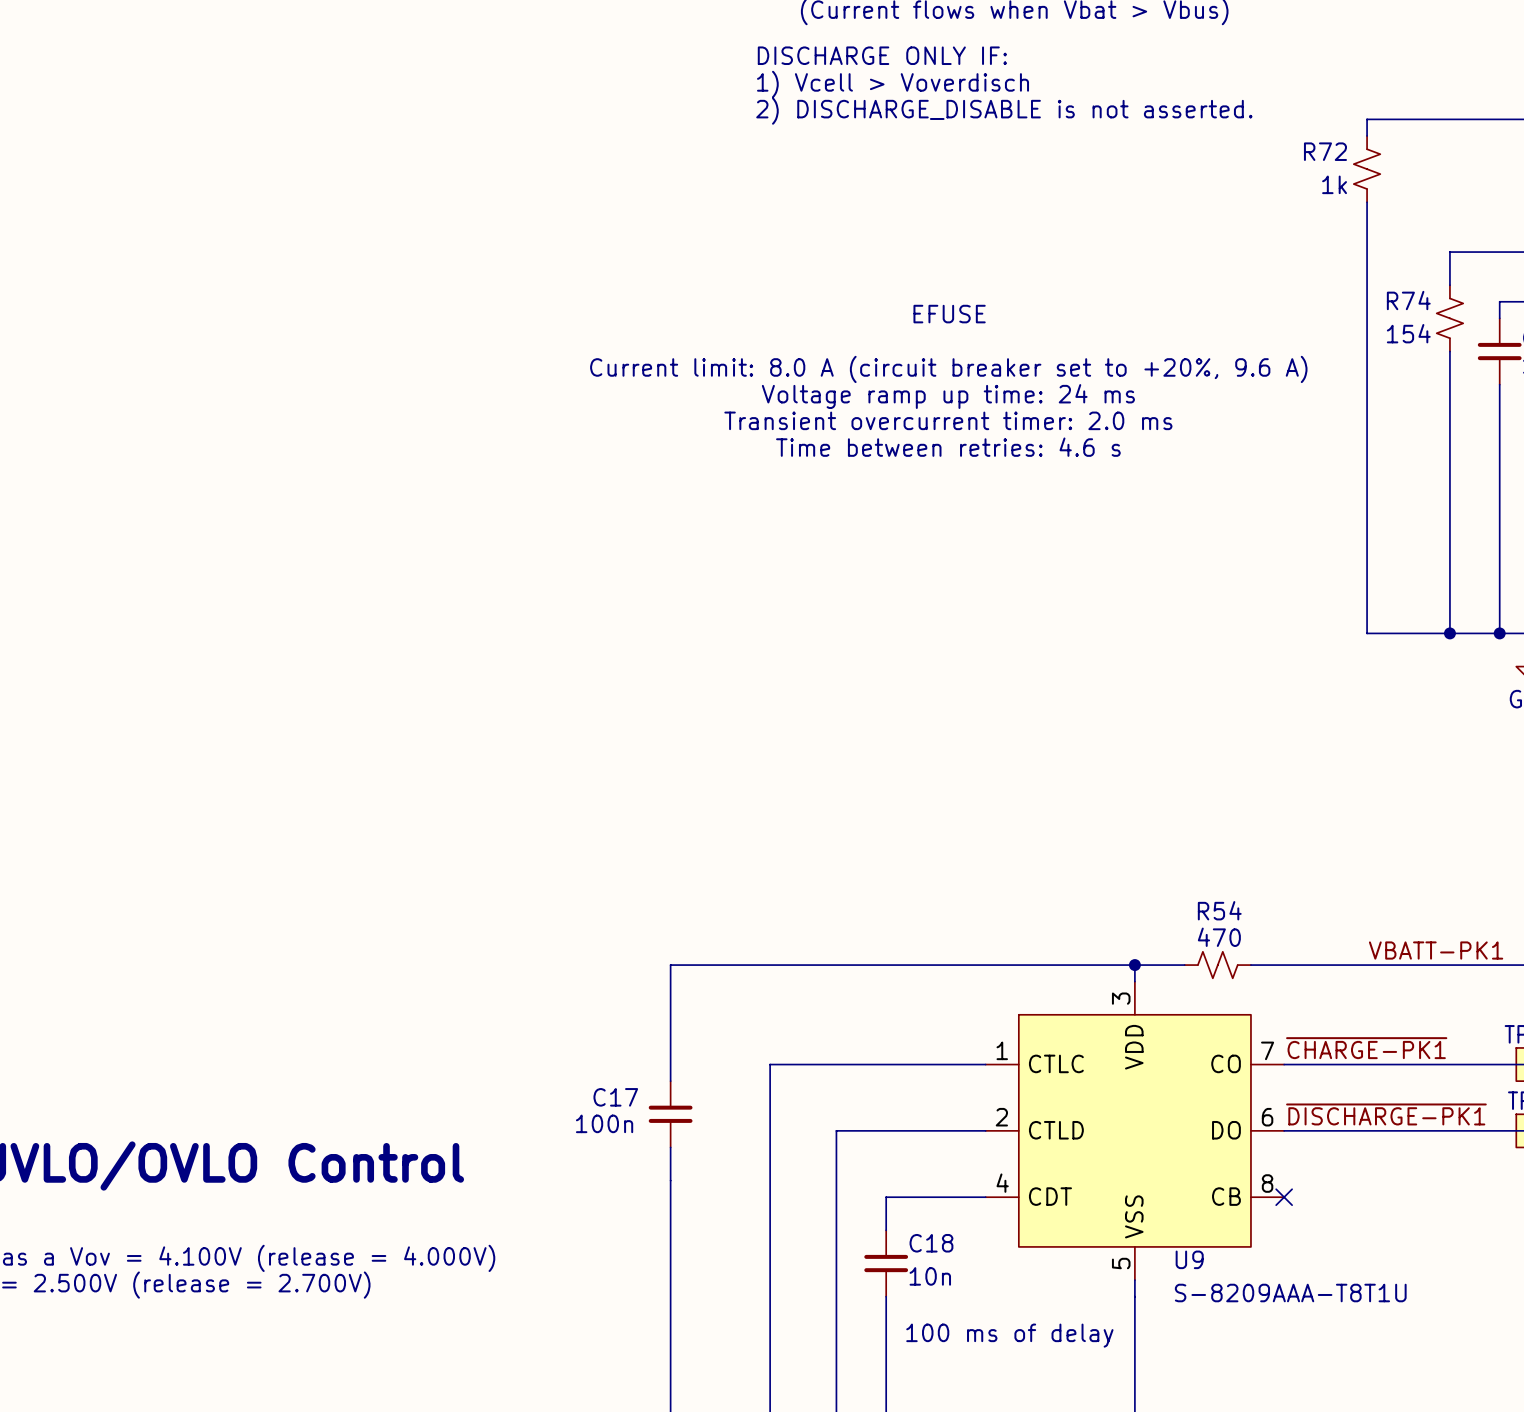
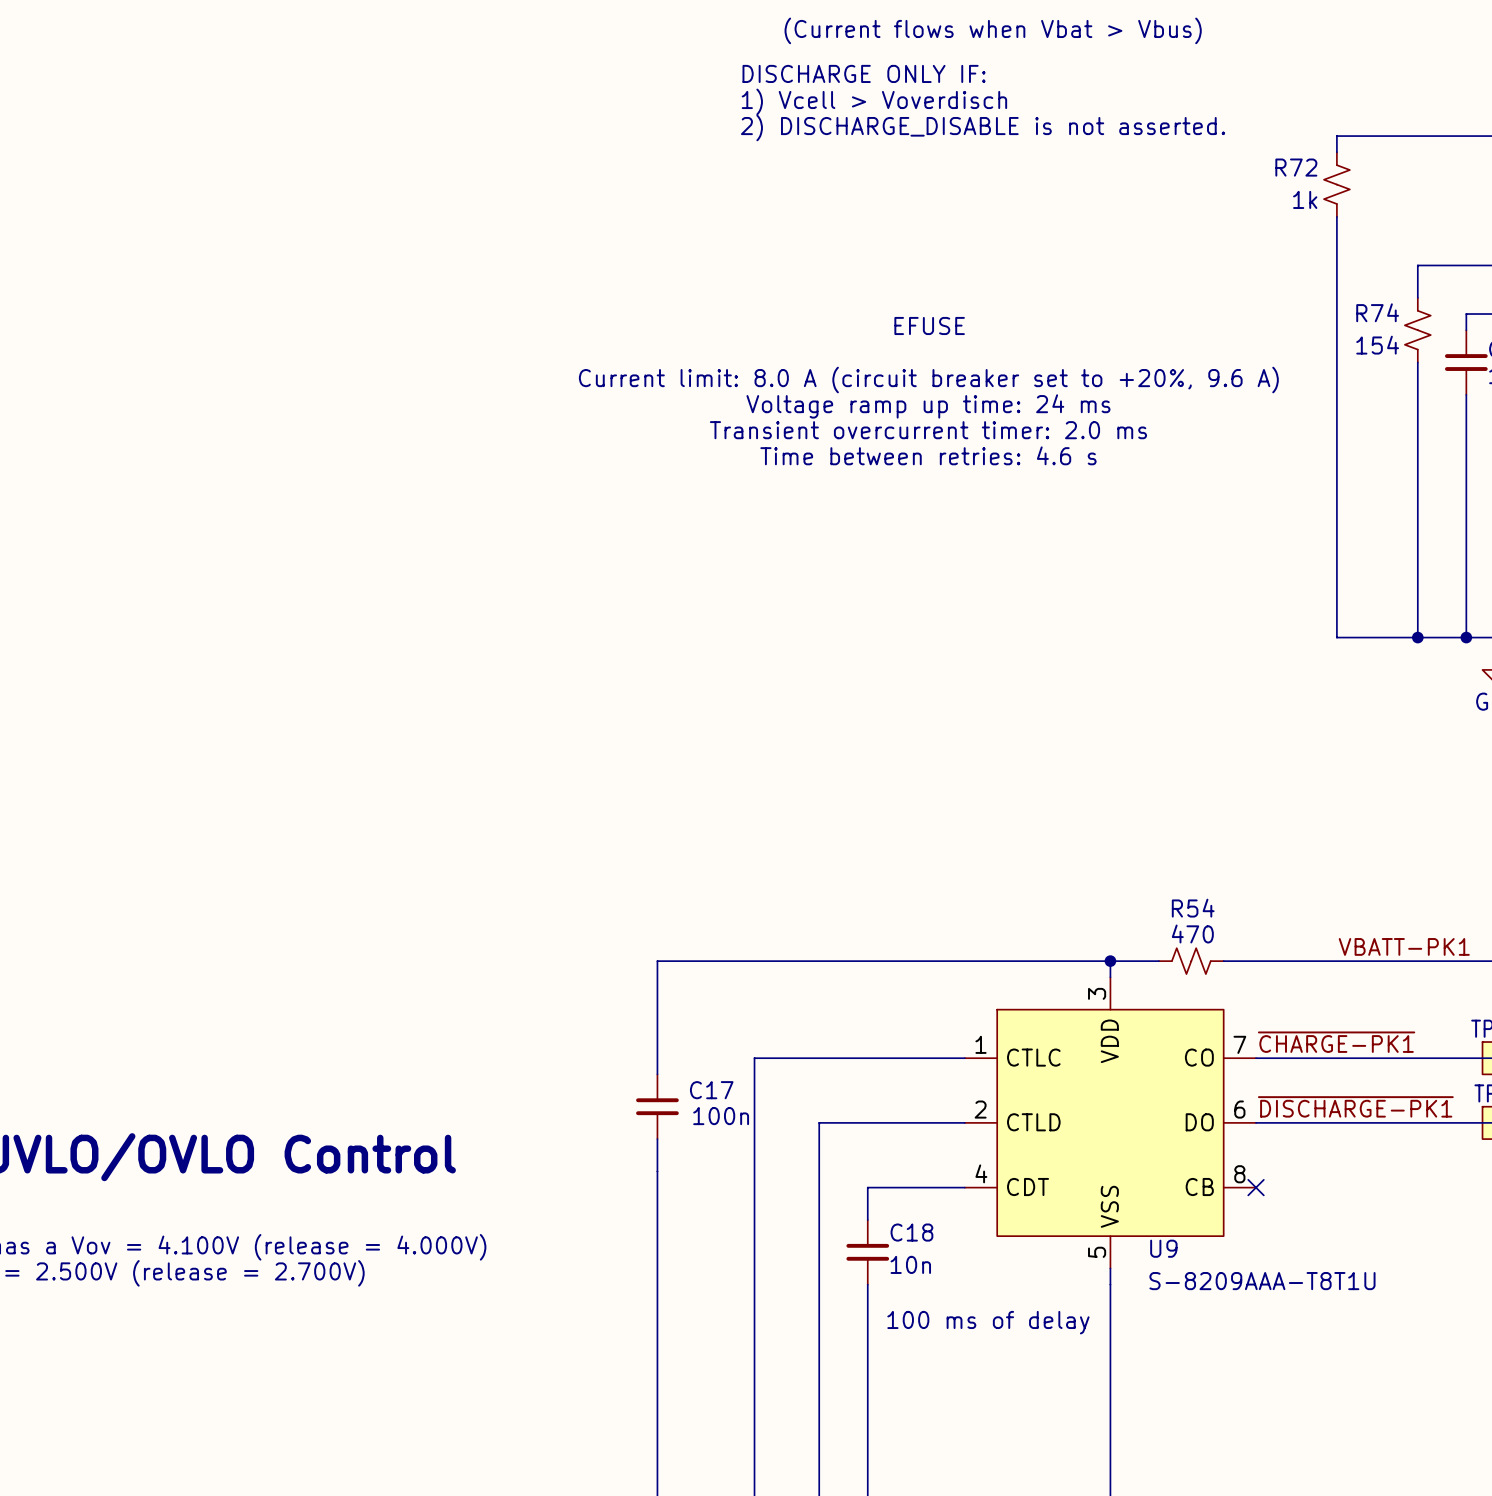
C17 name position: C17 (615, 1097) -> C17 (711, 1090)
C17 value position: 100n (604, 1123) -> 100n (721, 1116)

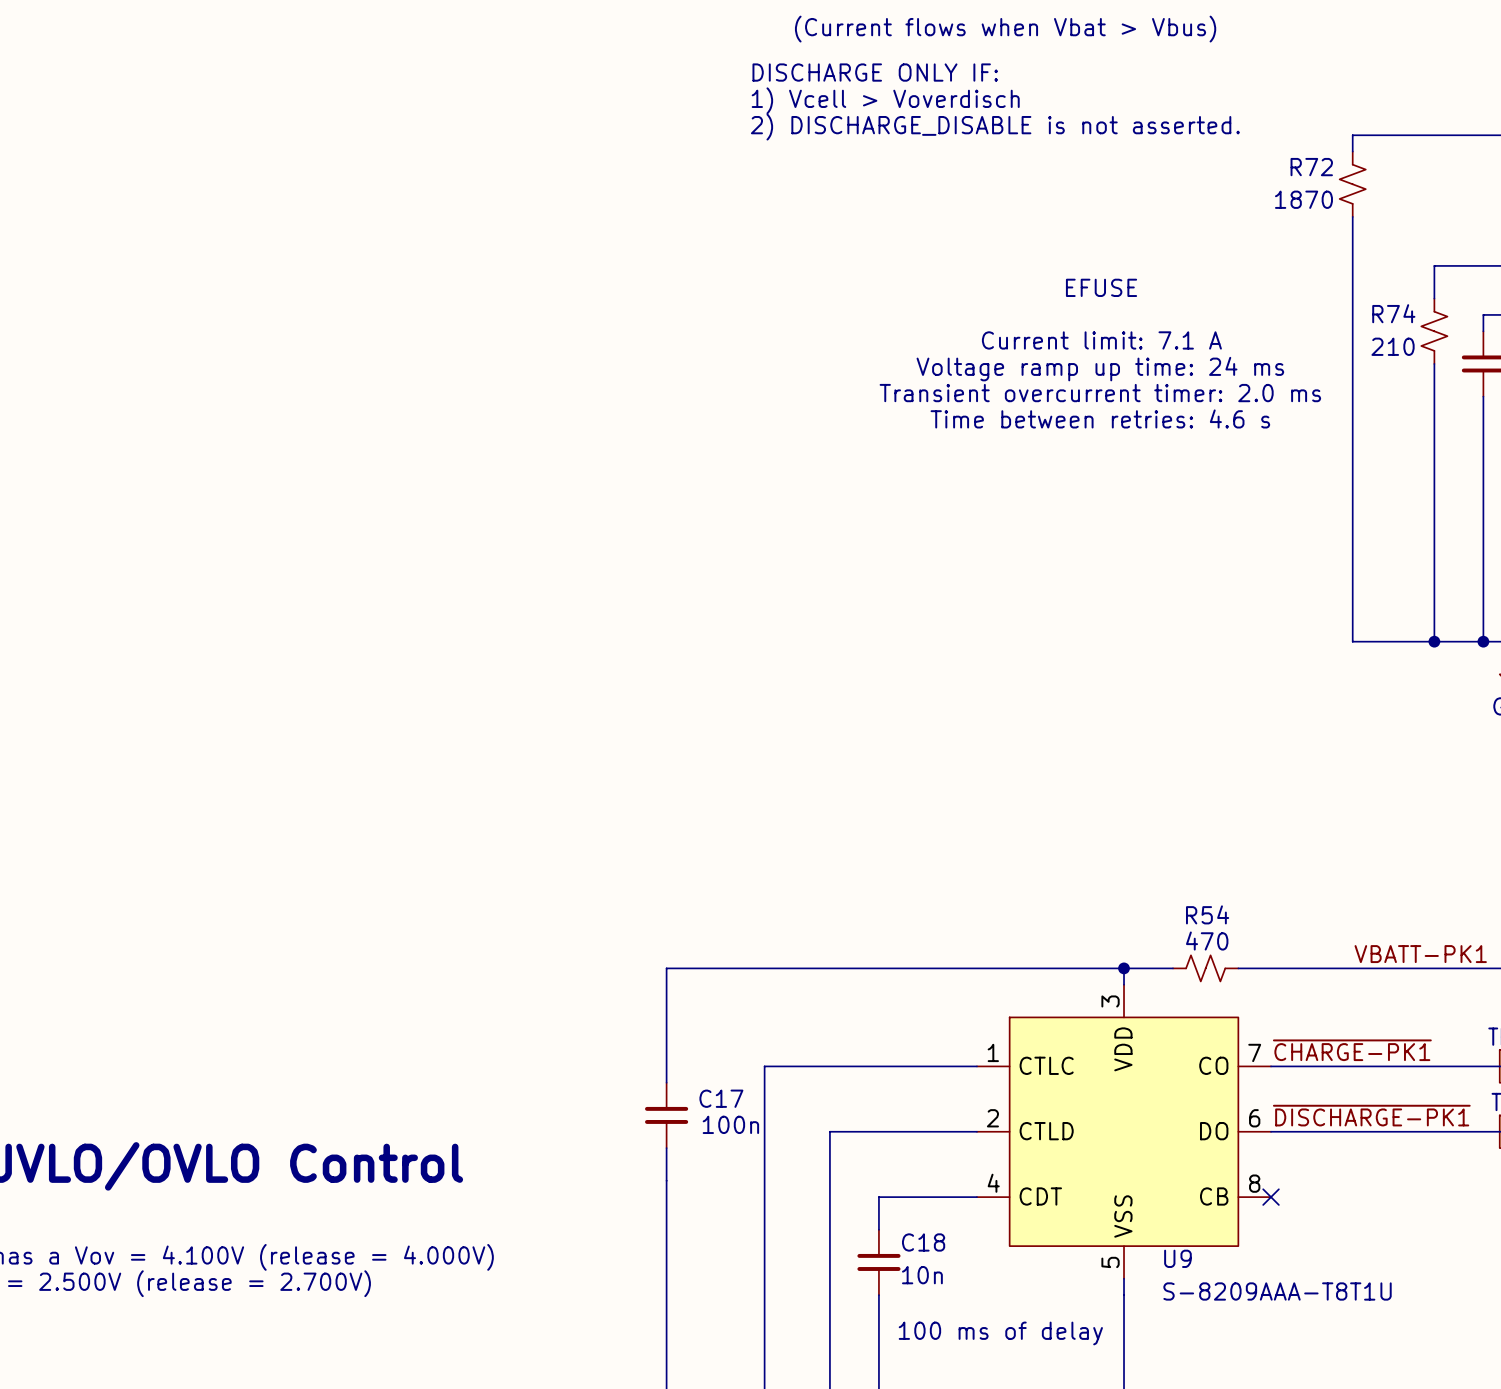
R72 value: 1k (1305, 199) -> 1870 (1303, 199)
text position: EFUSE (929, 325) -> EFUSE (1101, 287)
text: none -> Current limit: 7.1 A (1101, 340)
R74 value: 154 (1377, 345) -> 210 (1393, 346)
text: Current limit: 8.0 A (circuit breaker set to +20%, 9.6 A) (928, 380) -> none
text position: Voltage ramp up time: 24 ms (928, 406) -> Voltage ramp up time: 24 ms (1100, 369)
text position: Transient overcurrent timer: 2.0 ms (928, 430) -> Transient overcurrent timer: 2.0 ms (1100, 393)
text position: Time between retries: 4.6 s (928, 455) -> Time between retries: 4.6 s (1100, 418)

